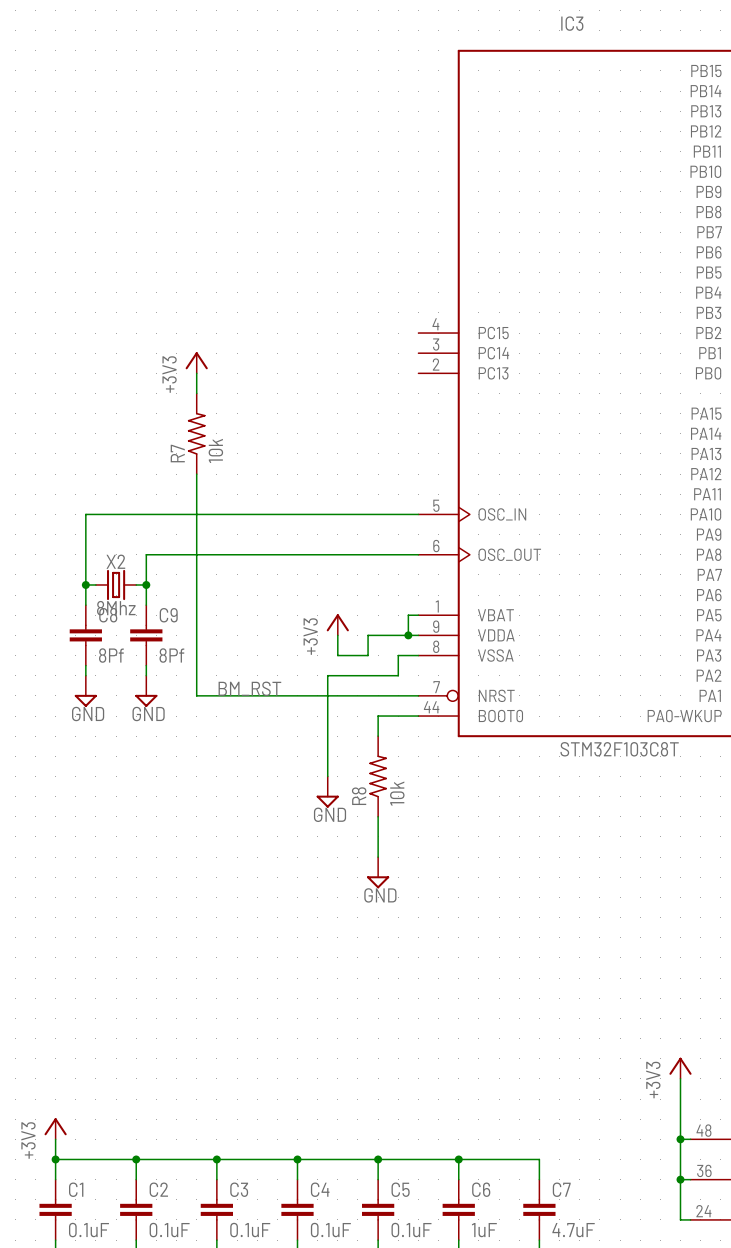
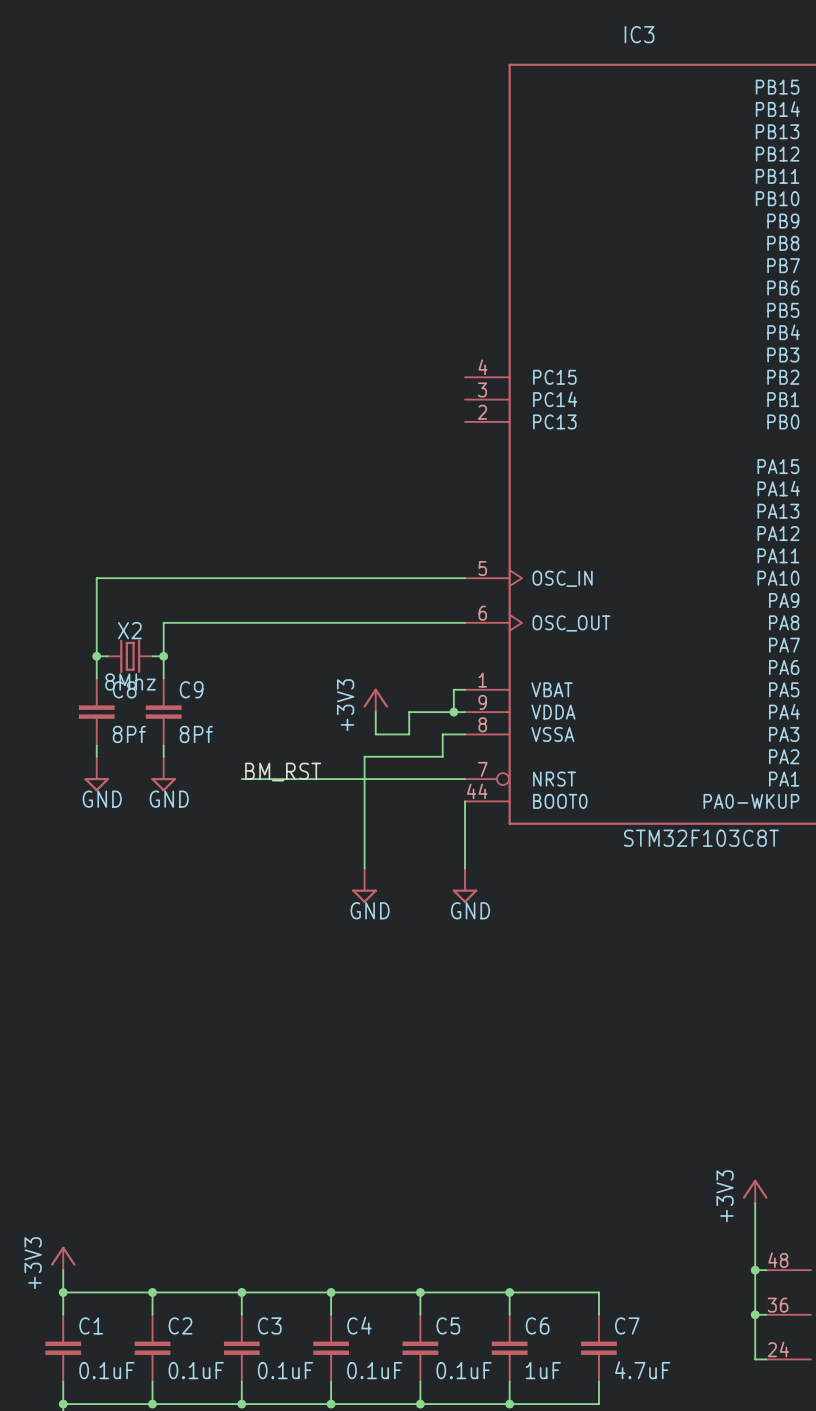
power symbol: +3V3 (196, 362) -> none
wire: (196, 373) (196, 393) -> none
R7: 10k (196, 433) -> none
wire: (196, 474) (196, 695) (216, 695) -> none
wire: (418, 716) (378, 716) (378, 736) -> (465, 801) (465, 868)
R8: 10k (378, 776) -> none
wire: (378, 816) (378, 857) -> none
power symbol position: GND (378, 872) -> GND (465, 885)

